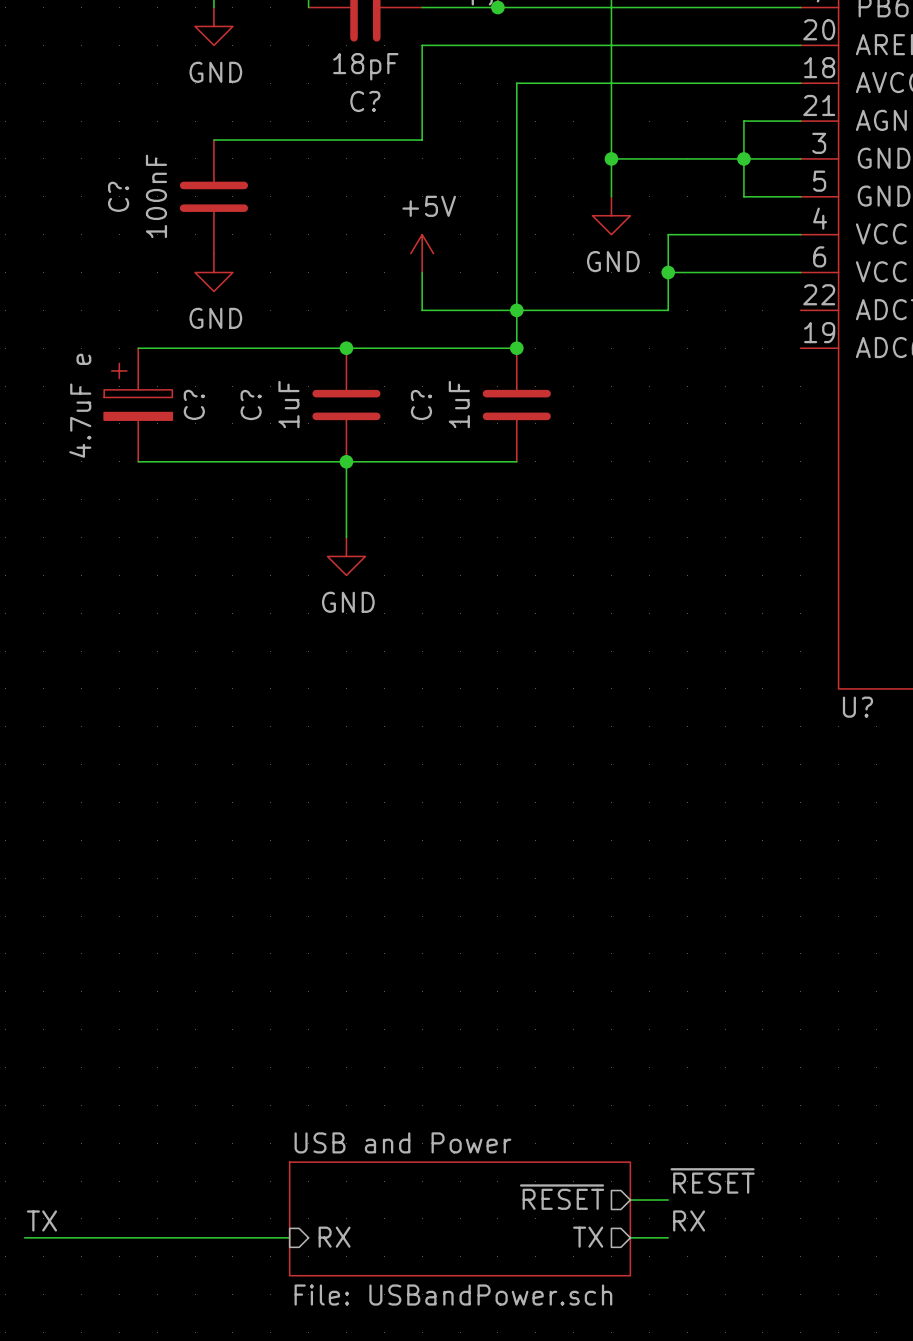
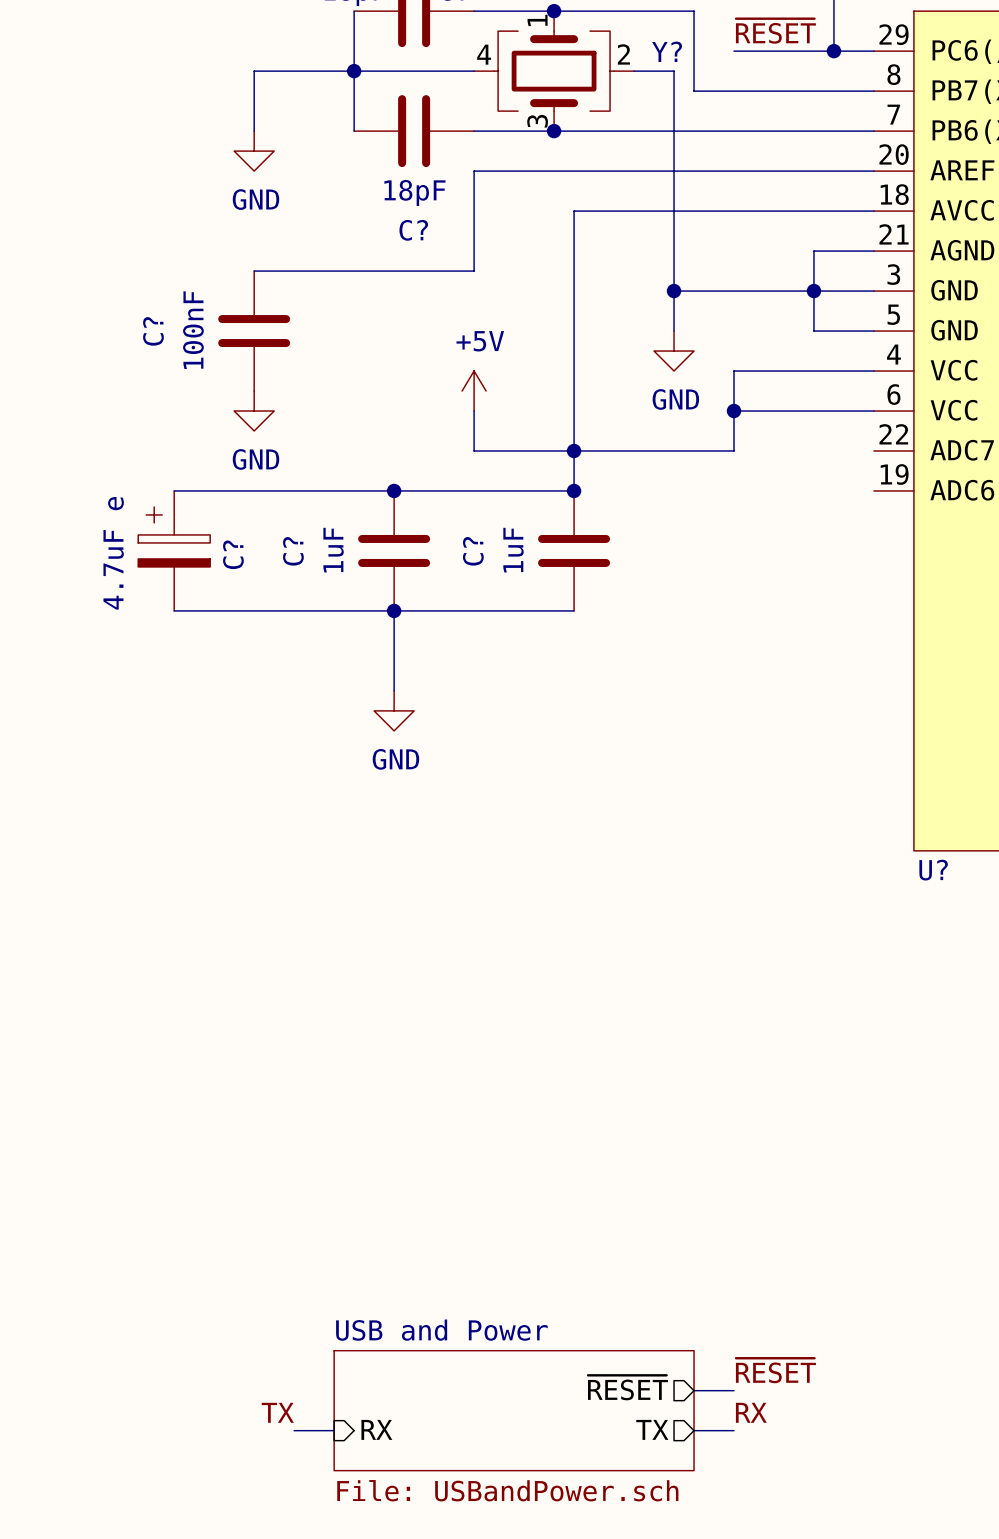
label position: TX (41, 1220) -> TX (277, 1412)
wire: (24, 1237) (251, 1237) -> none

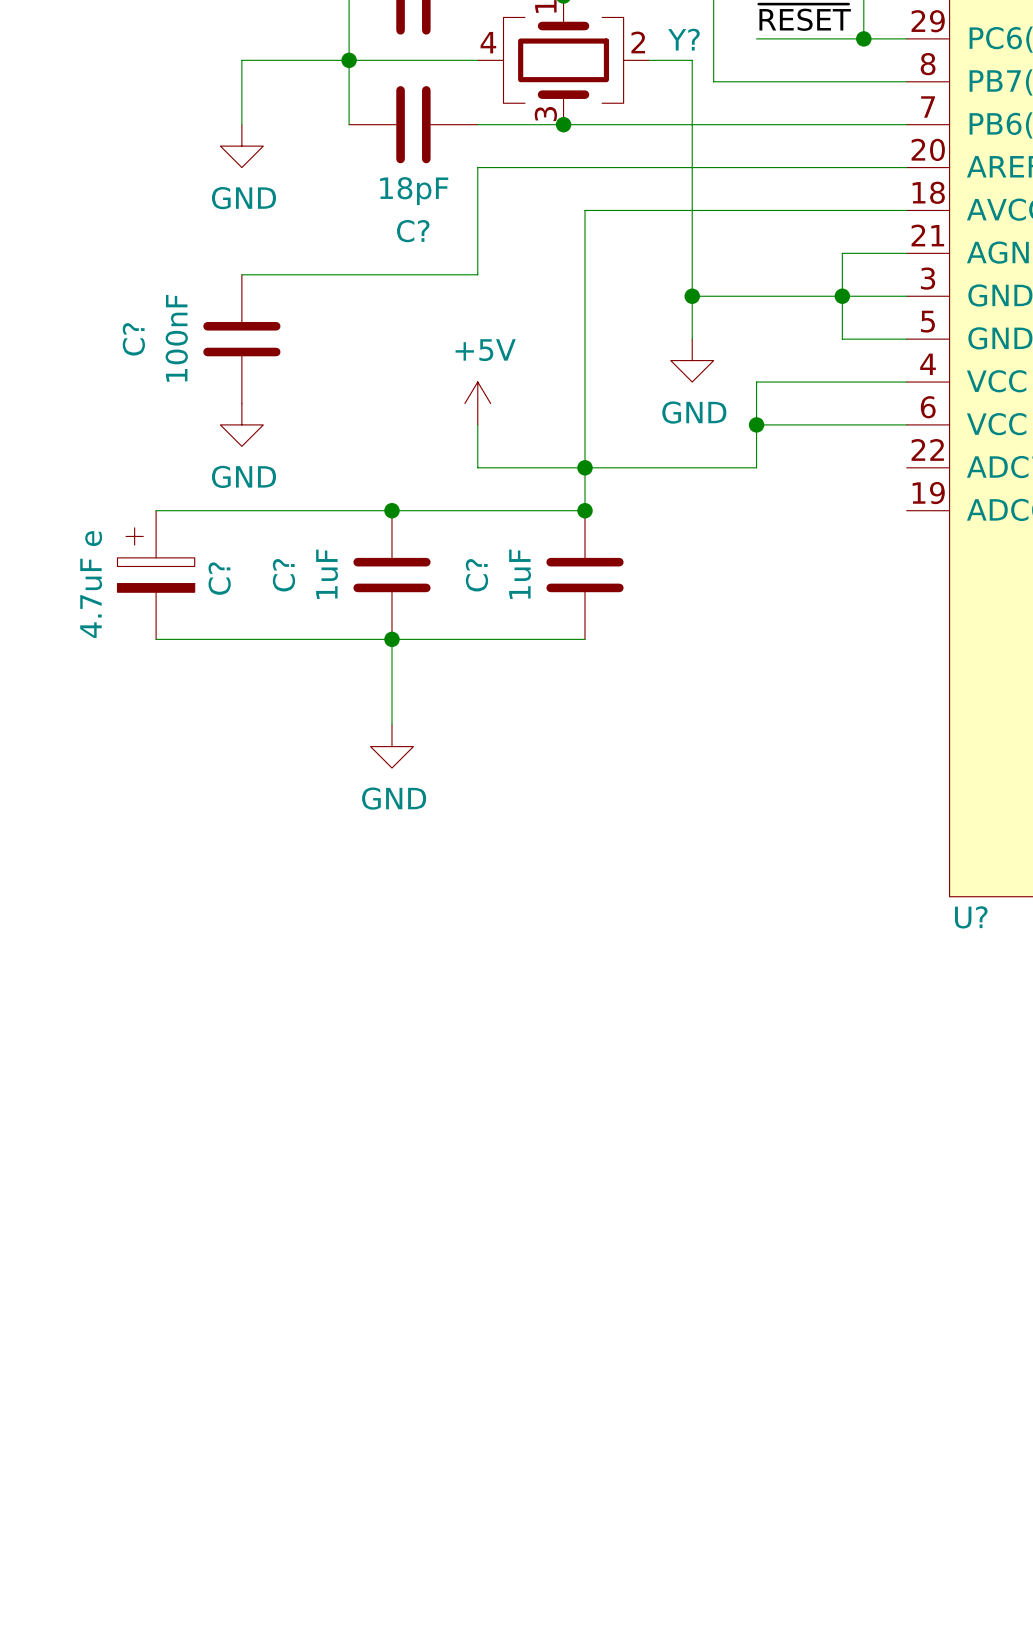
label: ~{RESET} (775, 1370) -> none
sheet pin: ~{RESET} (627, 1387) -> none
wire: (694, 1390) (734, 1390) -> none
sheet USB and Power: File: USBandPower.sch (514, 1410) -> none
label: TX (277, 1412) -> none
label: RX (751, 1412) -> none
sheet pin: RX (376, 1429) -> none
sheet pin: TX (652, 1429) -> none
wire: (294, 1430) (334, 1430) -> none
wire: (694, 1430) (734, 1430) -> none

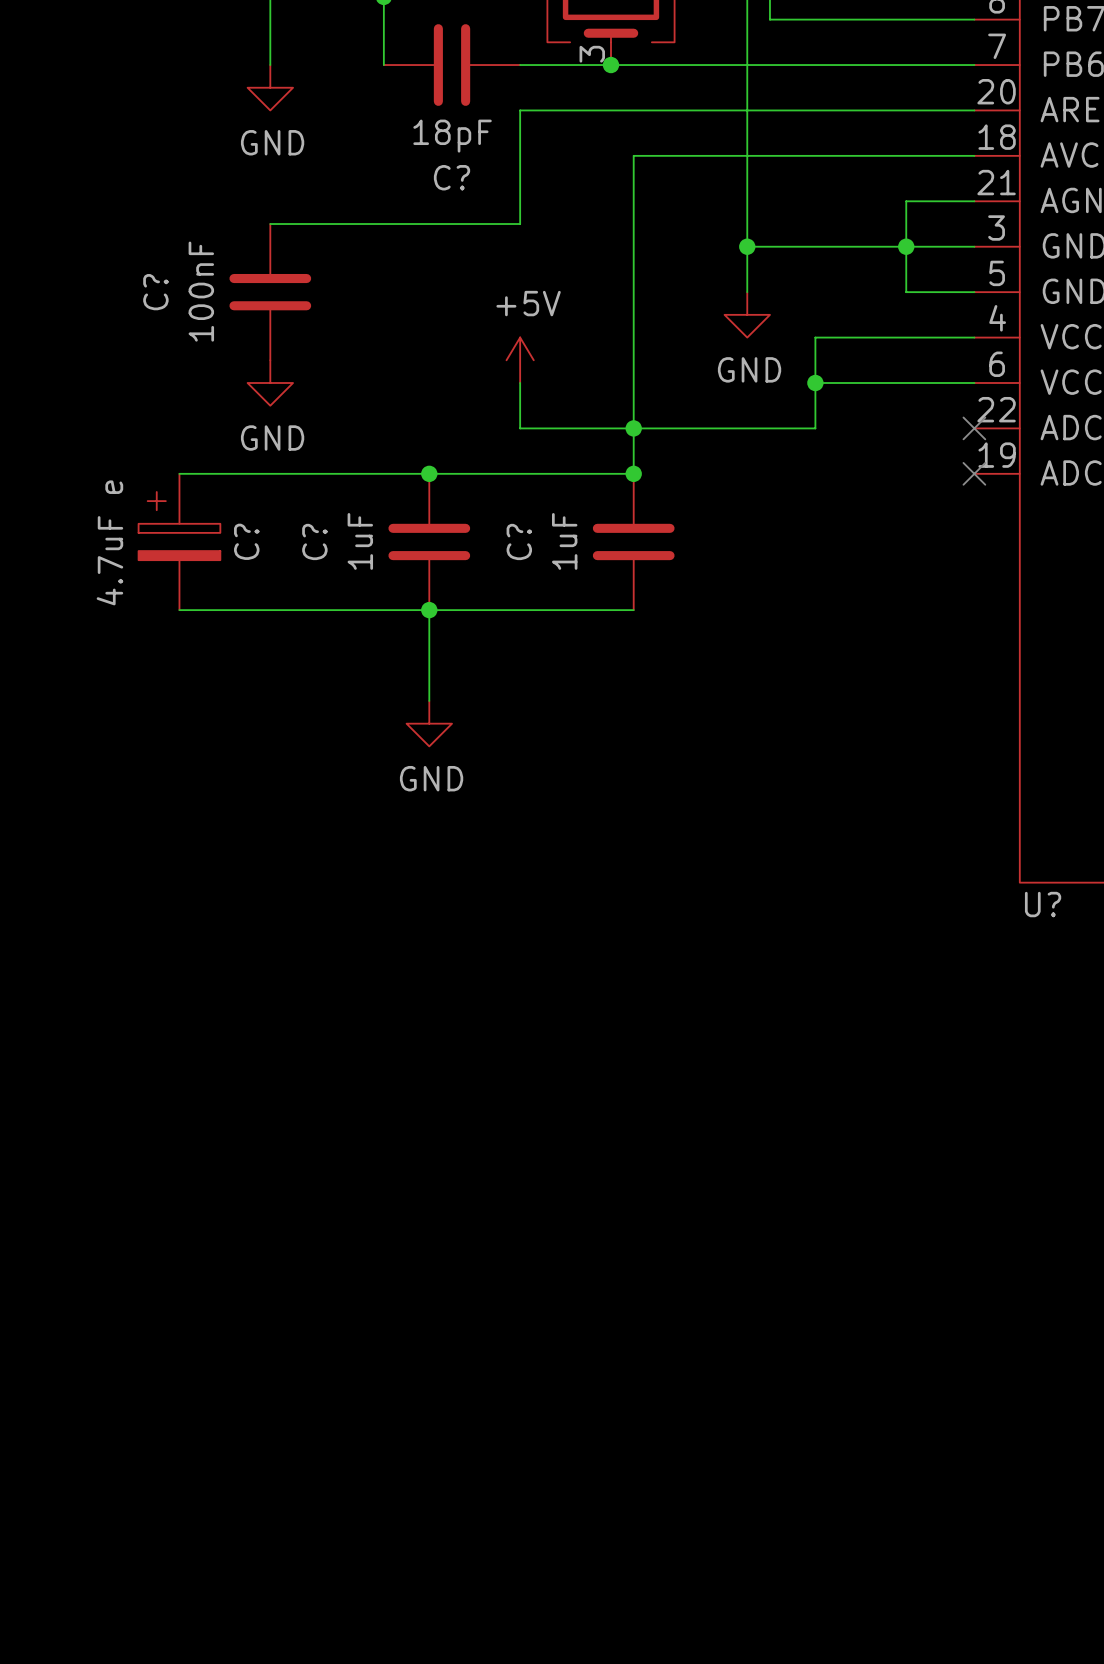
no-connect mark: none -> (974, 428)
no-connect mark: none -> (974, 473)

